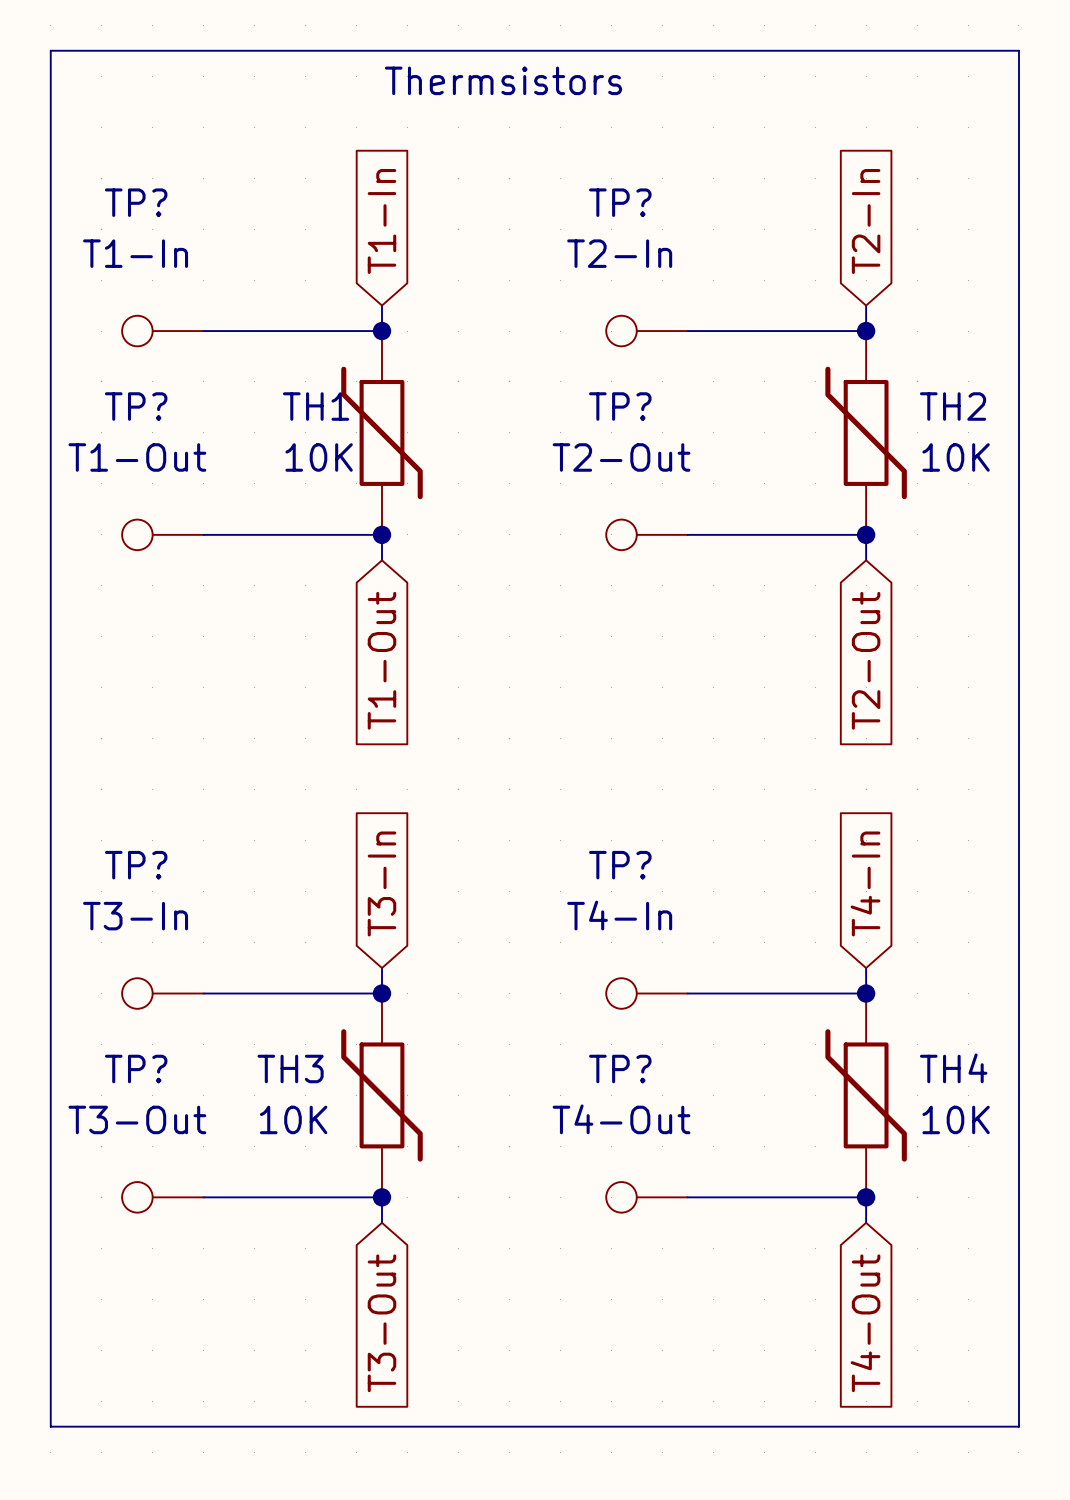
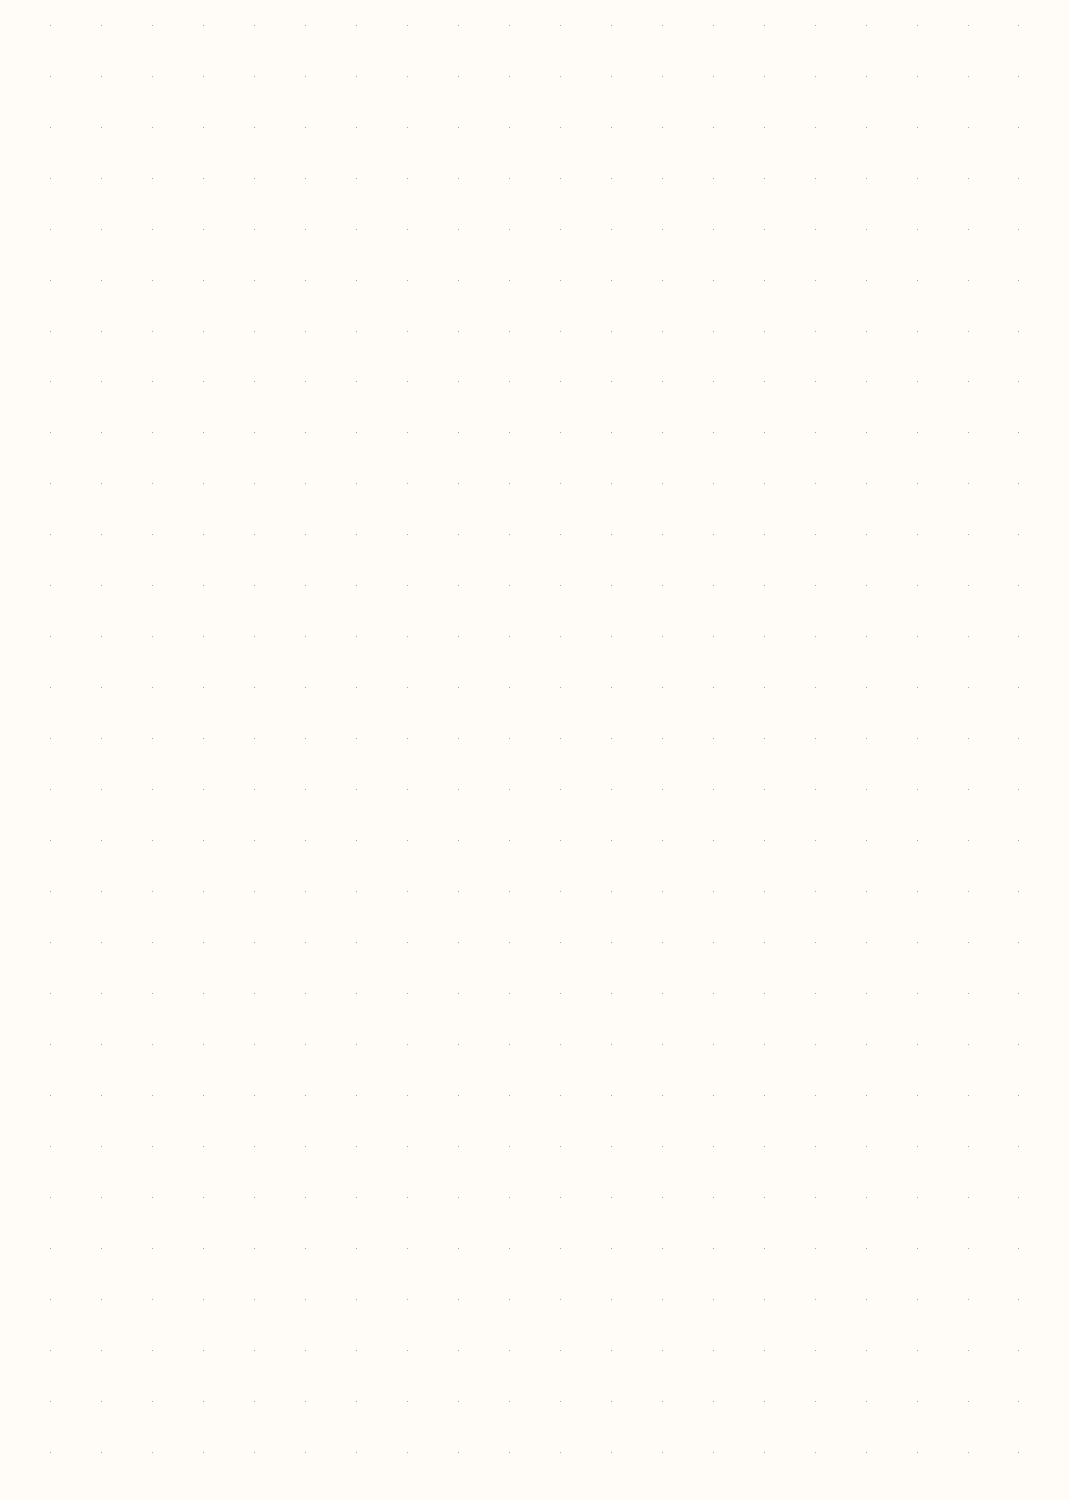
line: (50, 50) (50, 1426) (1018, 1426) (1018, 50) (50, 50) -> none
text: Thermsistors (503, 80) -> none
global label: T1-In (381, 221) -> none
global label: T2-In (866, 221) -> none
wire: (381, 305) (381, 331) (203, 331) -> none
wire: (866, 305) (866, 331) (687, 331) -> none
TP?: T1-In (162, 331) -> none
junction: (381, 331) -> none
TP?: T2-In (646, 331) -> none
junction: (866, 331) -> none
TH1: 10K (381, 432) -> none
TH2: 10K (866, 432) -> none
TP?: T1-Out (162, 534) -> none
wire: (203, 534) (381, 534) (381, 560) -> none
junction: (381, 534) -> none
TP?: T2-Out (646, 534) -> none
wire: (687, 534) (866, 534) (866, 560) -> none
junction: (866, 534) -> none
global label: T1-Out (381, 660) -> none
global label: T2-Out (866, 660) -> none
global label: T3-In (381, 883) -> none
global label: T4-In (865, 883) -> none
wire: (381, 968) (381, 993) (203, 993) -> none
wire: (866, 968) (866, 993) (687, 993) -> none
TP?: T3-In (162, 993) -> none
junction: (381, 993) -> none
TP?: T4-In (646, 993) -> none
junction: (866, 993) -> none
TH3: 10K (381, 1095) -> none
TH4: 10K (866, 1095) -> none
TP?: T3-Out (162, 1197) -> none
wire: (203, 1197) (381, 1197) (381, 1222) -> none
junction: (381, 1197) -> none
TP?: T4-Out (646, 1197) -> none
wire: (687, 1197) (866, 1197) (866, 1222) -> none
junction: (866, 1197) -> none
global label: T3-Out (381, 1323) -> none
global label: T4-Out (865, 1323) -> none

